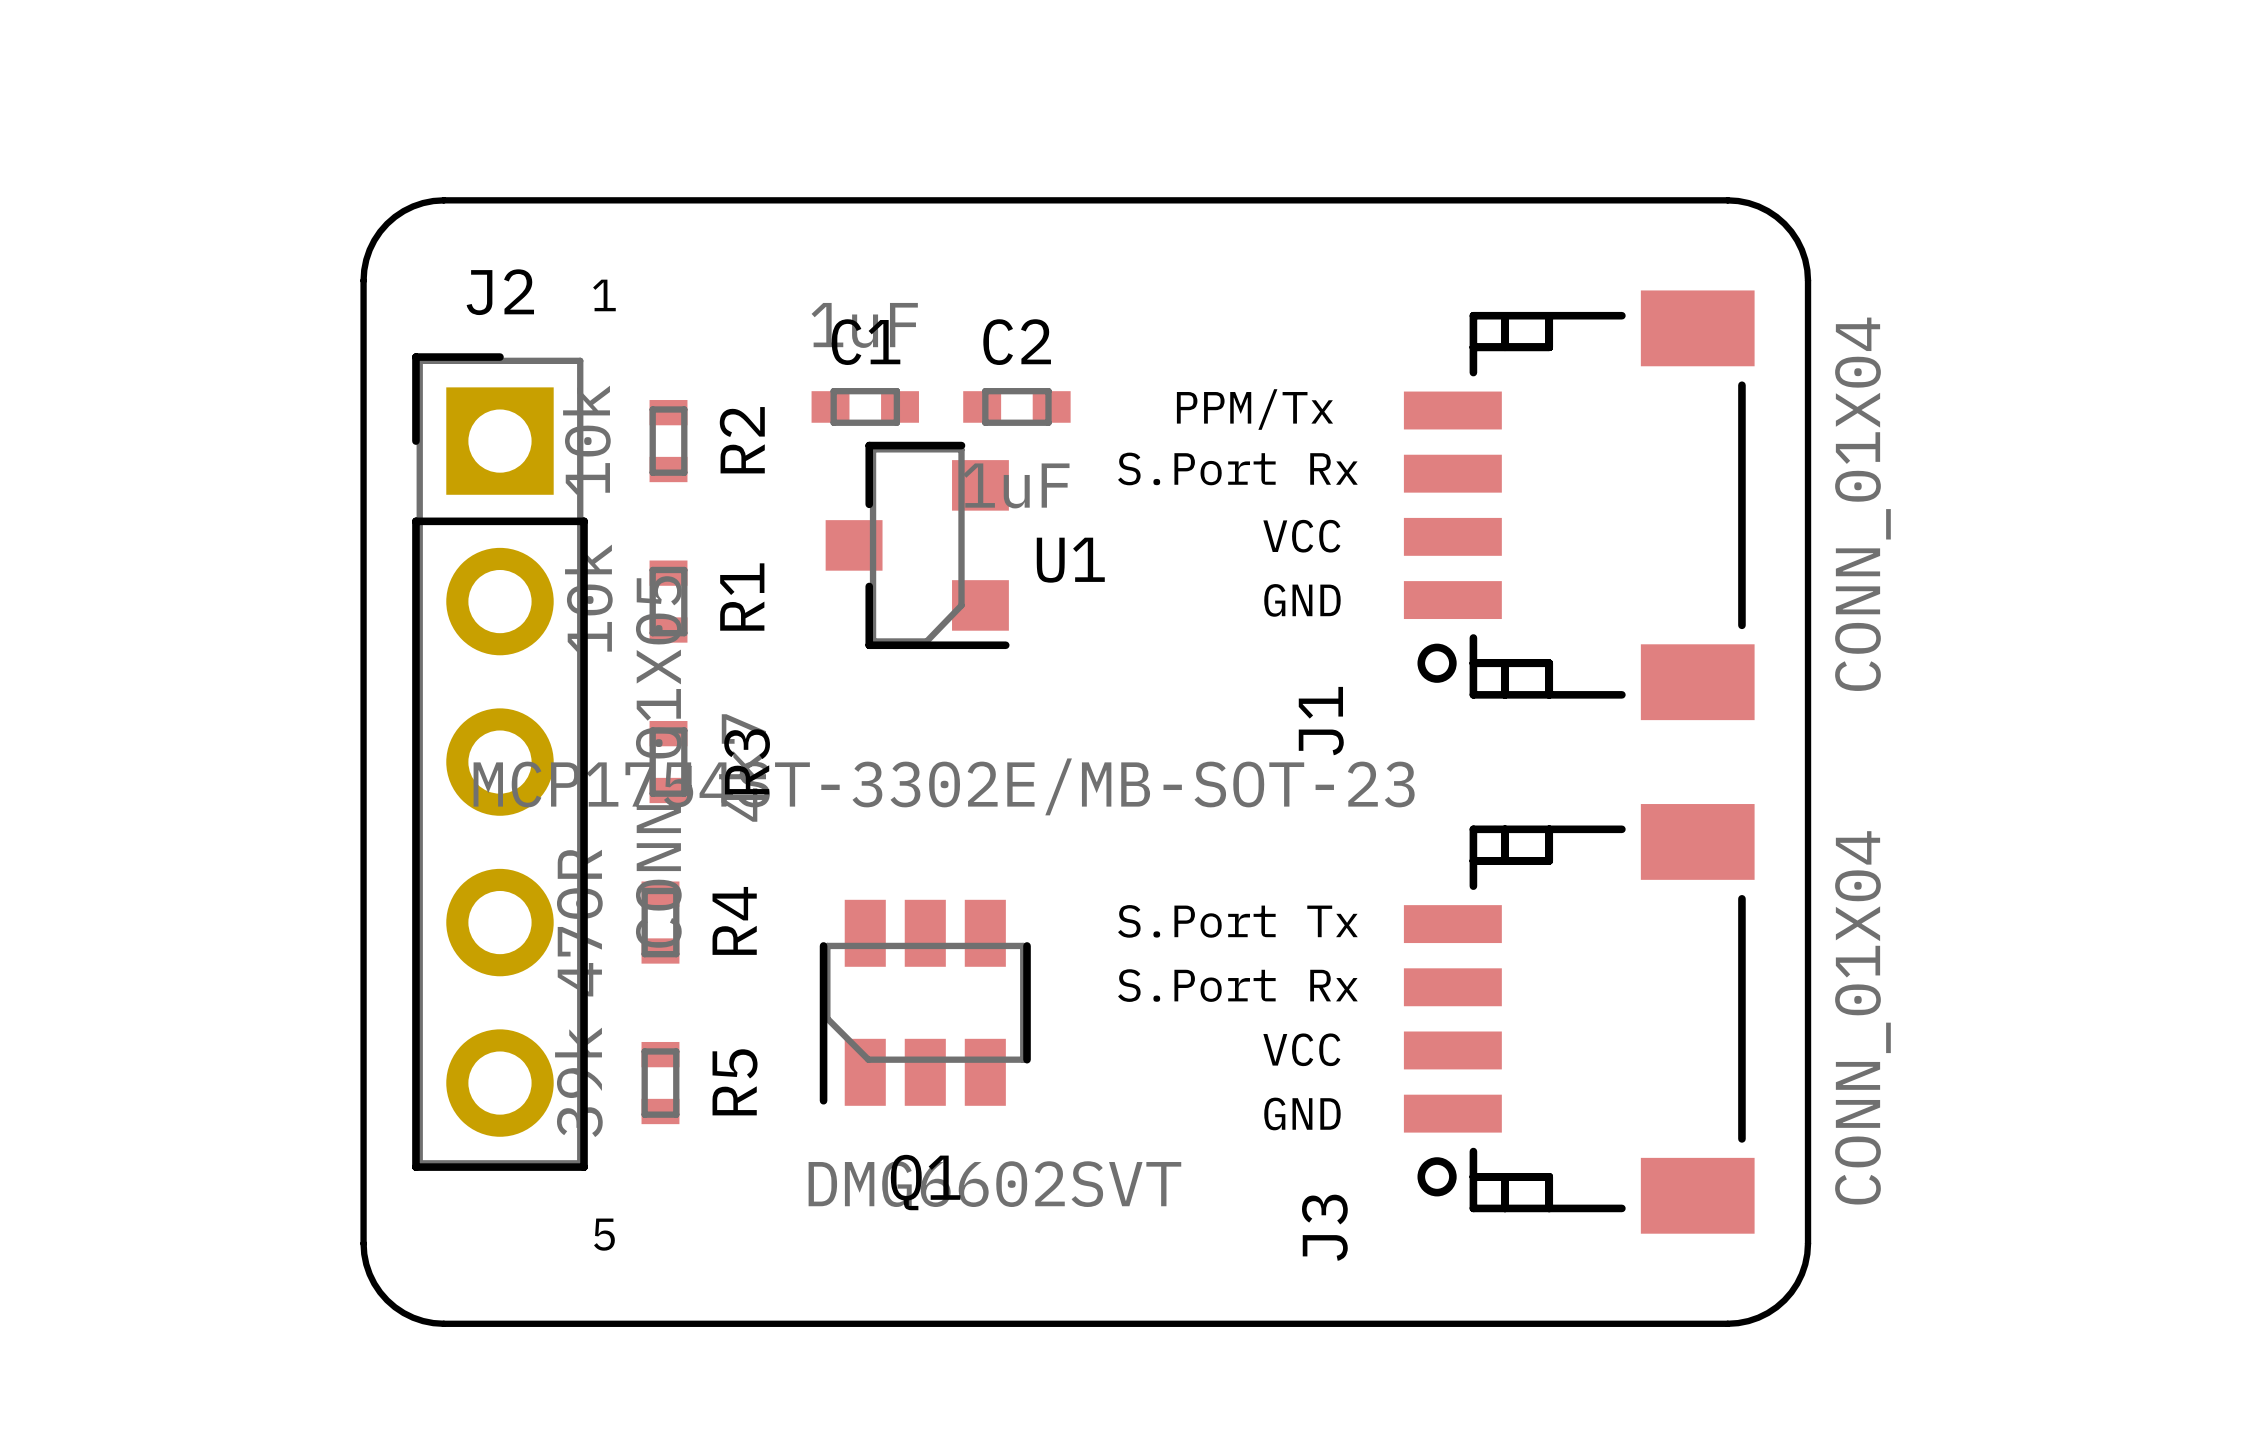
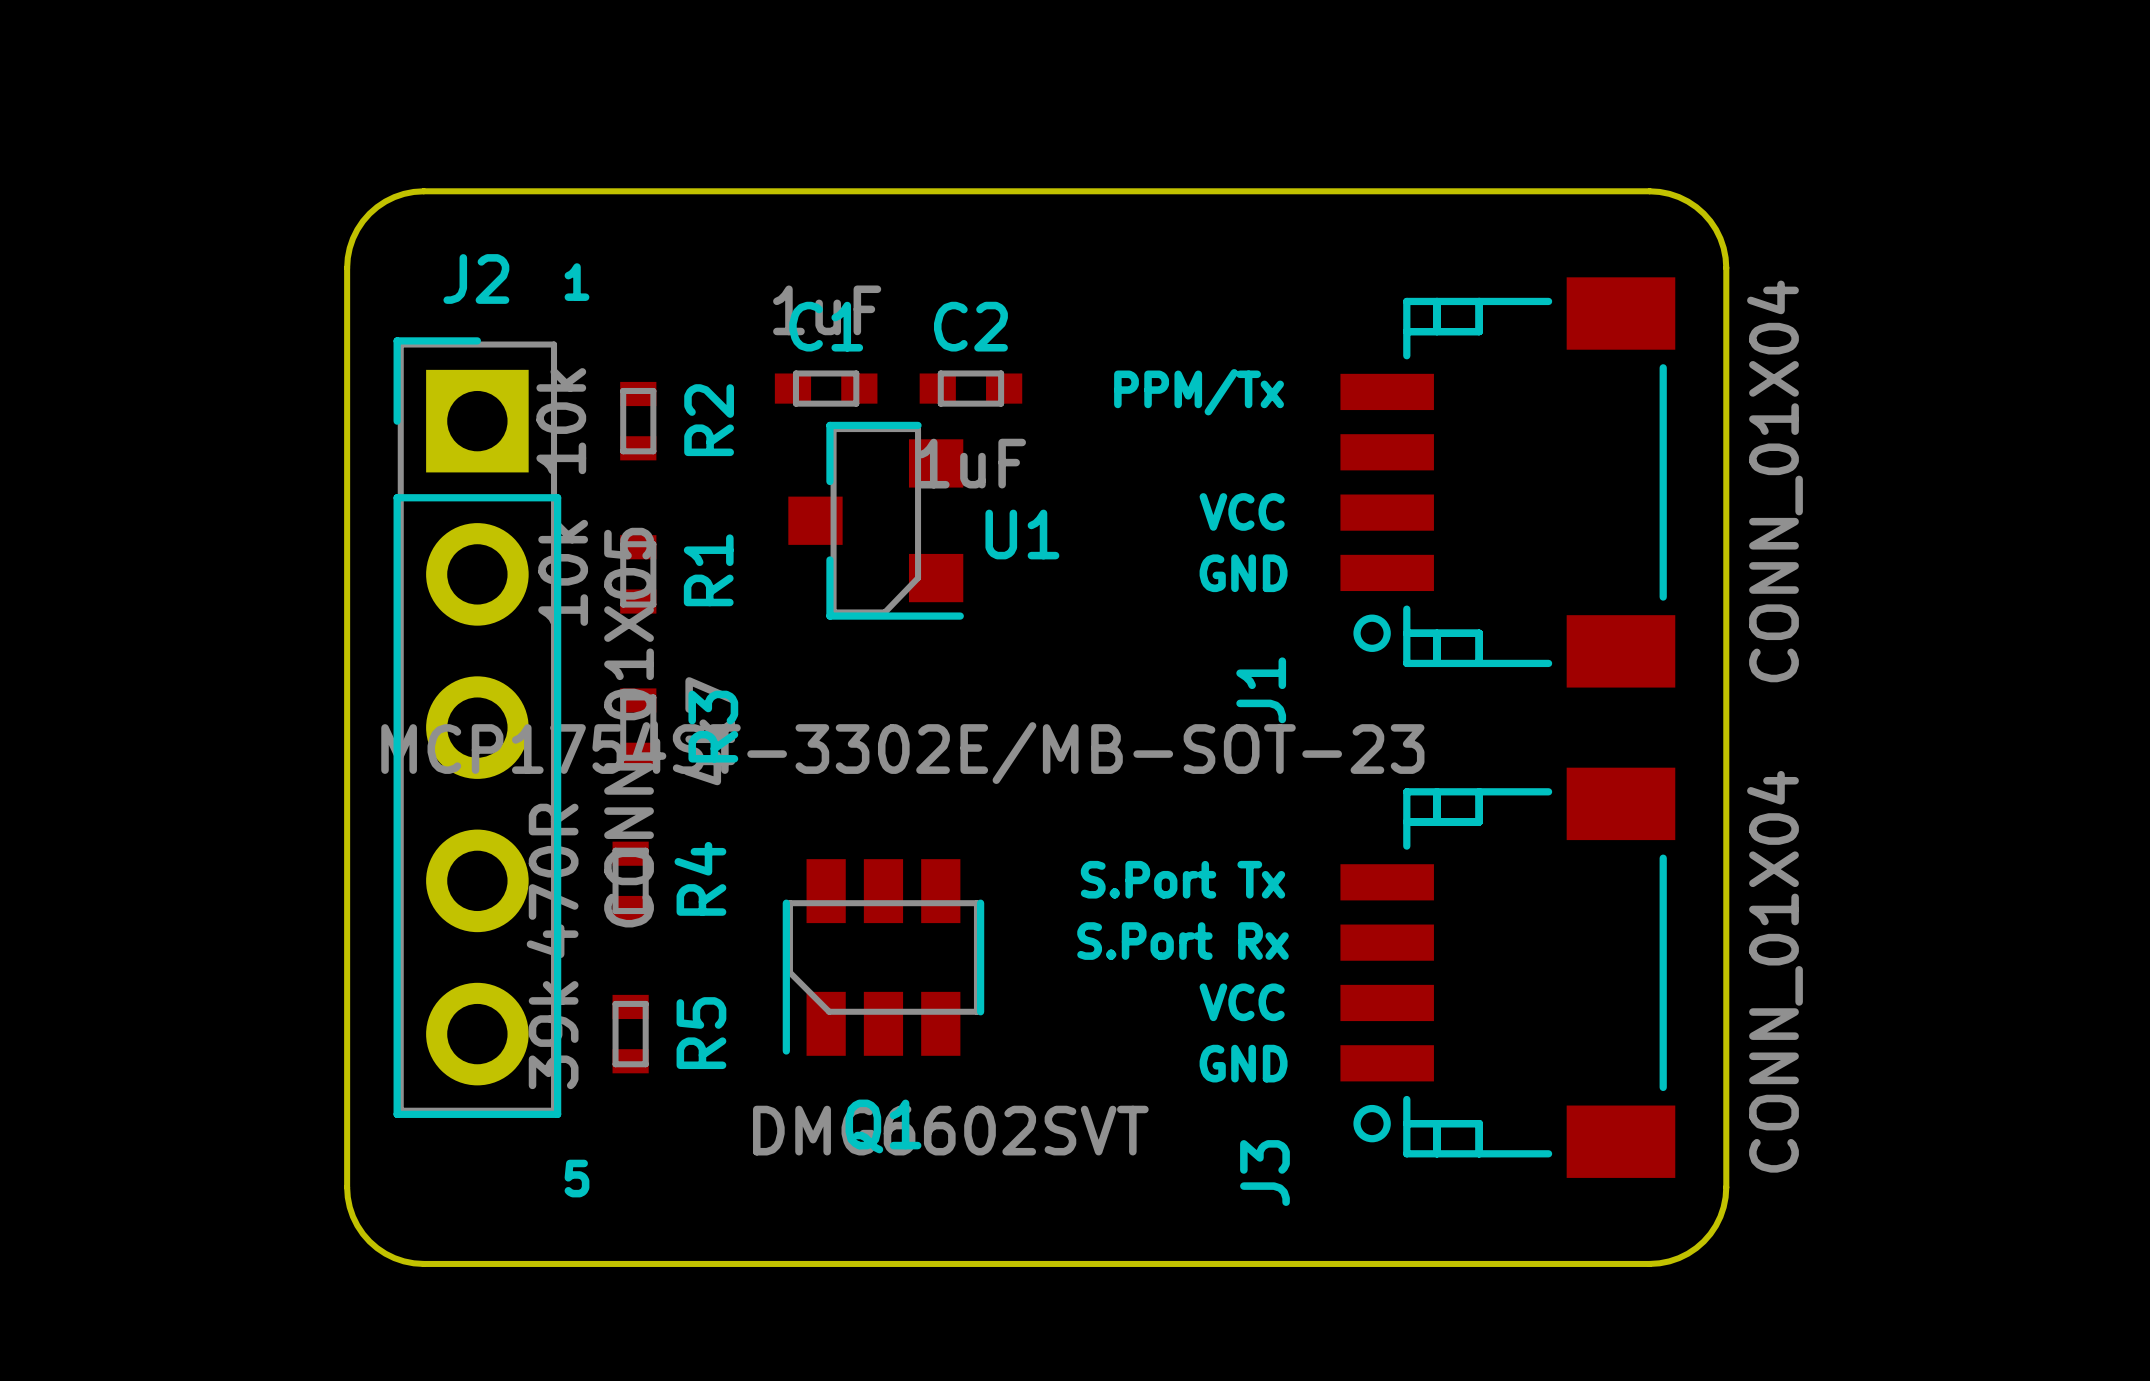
text: S.Port Rx (1237, 468) -> none

